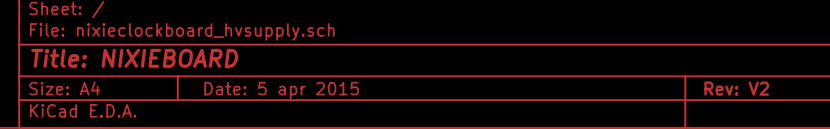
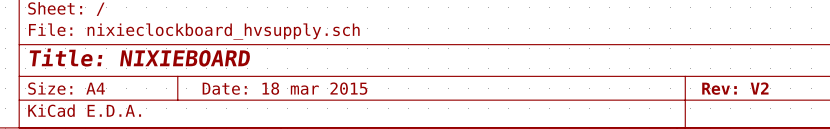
title block: Date: 5 apr 2015 (281, 90) -> Date: 18 mar 2015 (284, 88)

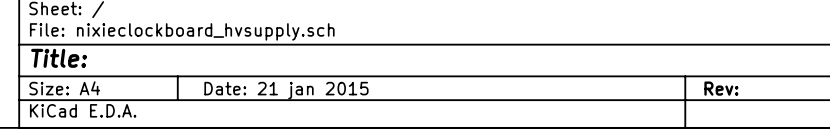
title block: Title: NIXIEBOARD (140, 57) -> Title: (59, 58)
title block: Date: 18 mar 2015 (284, 88) -> Date: 21 jan 2015 (286, 90)
title block: Rev: V2 (735, 88) -> Rev: (721, 88)

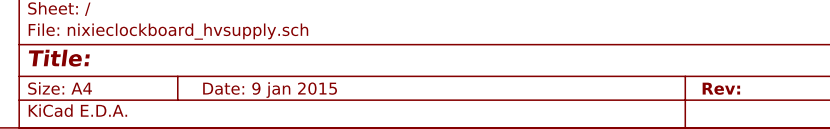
title block: Date: 21 jan 2015 (286, 90) -> Date: 9 jan 2015 (270, 90)

